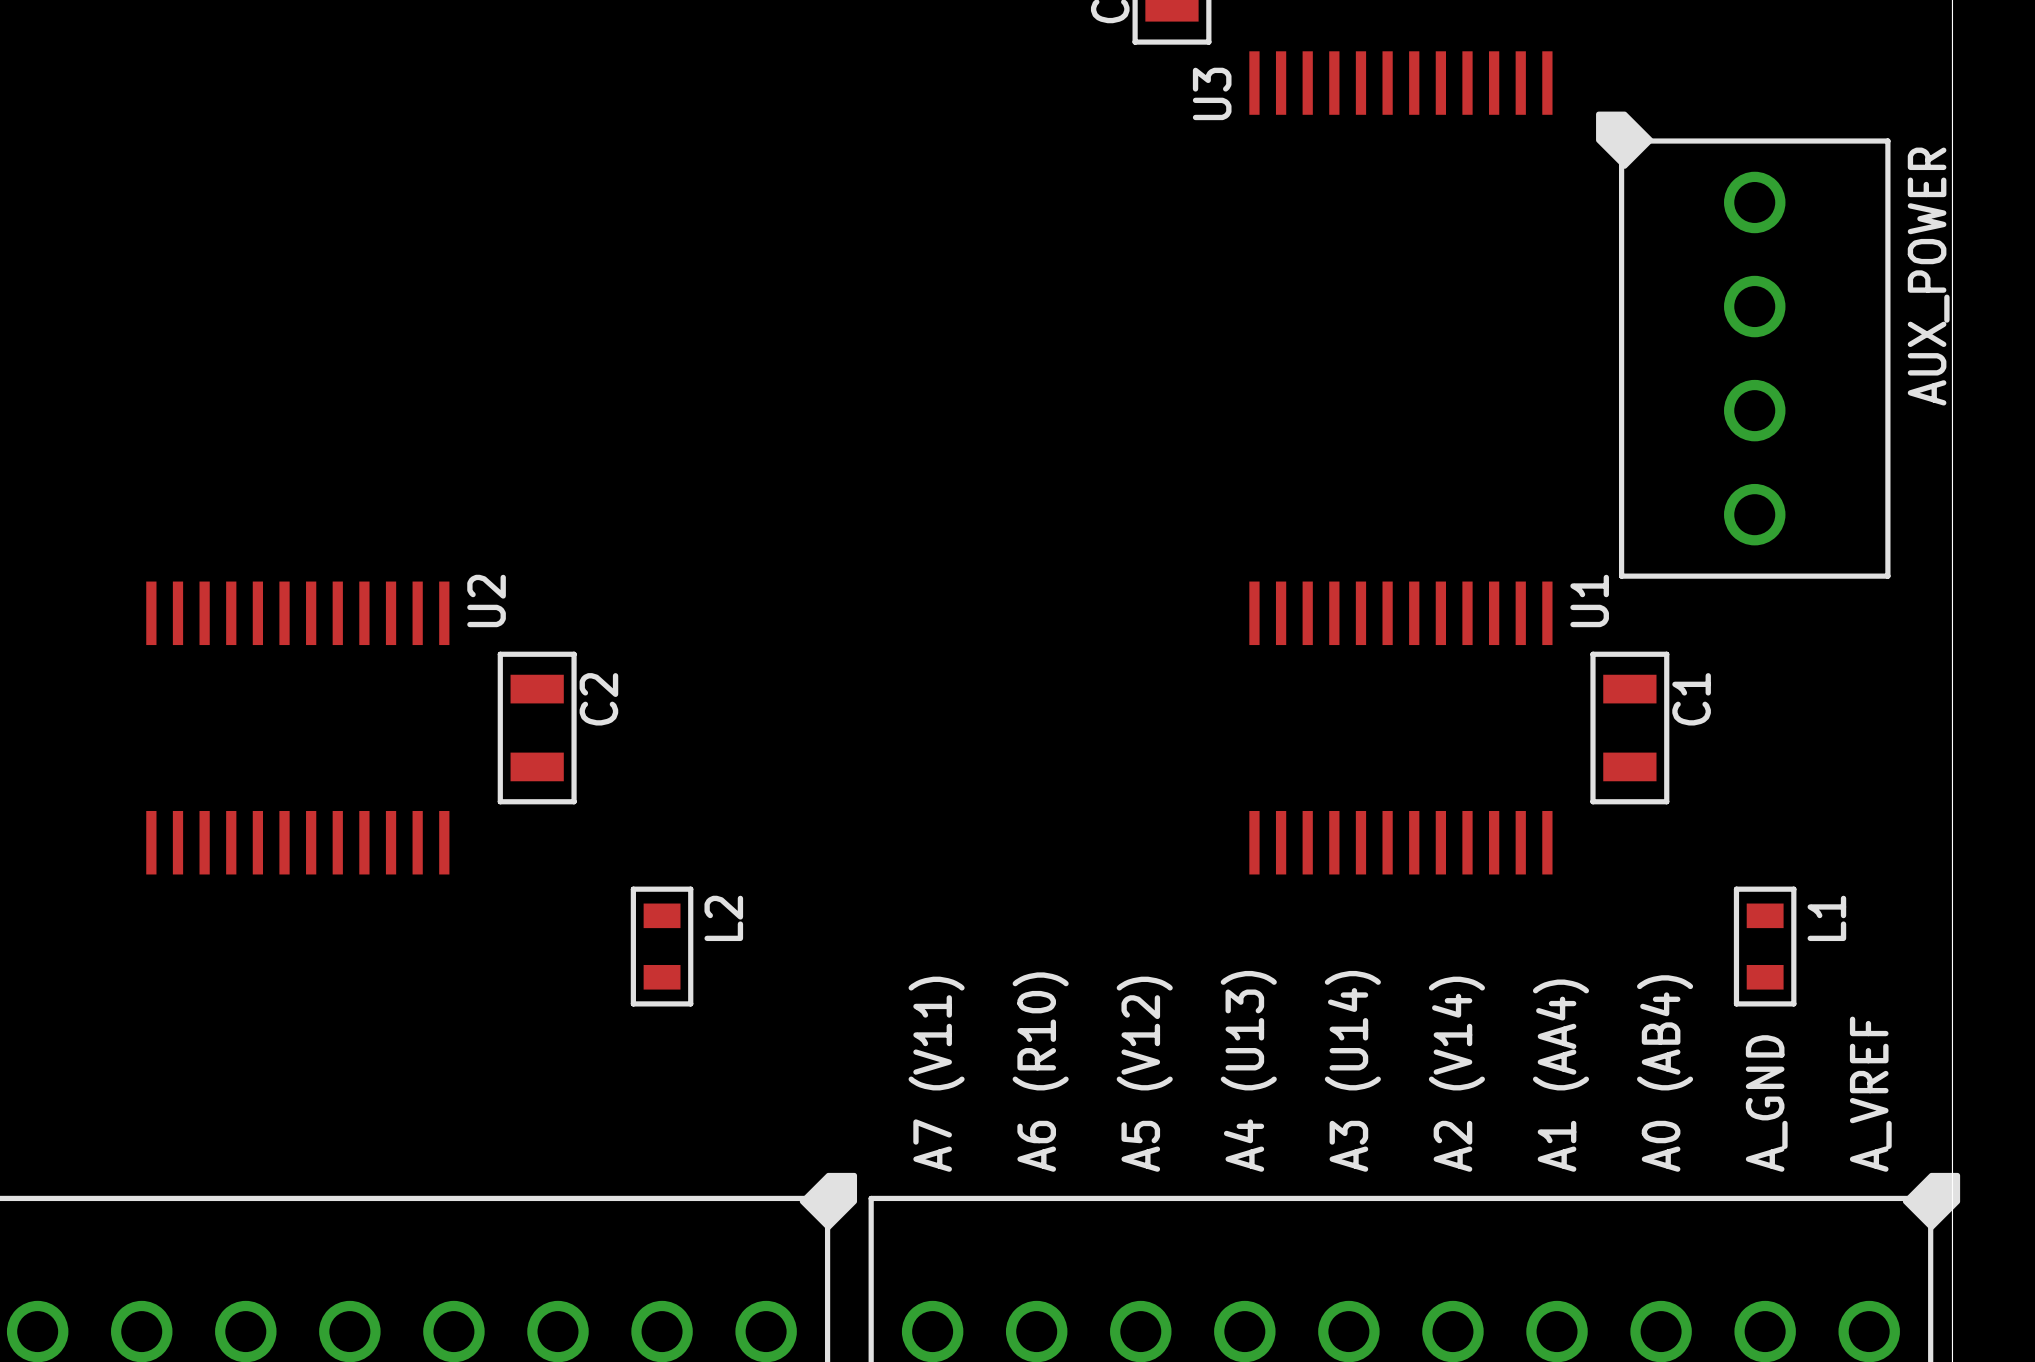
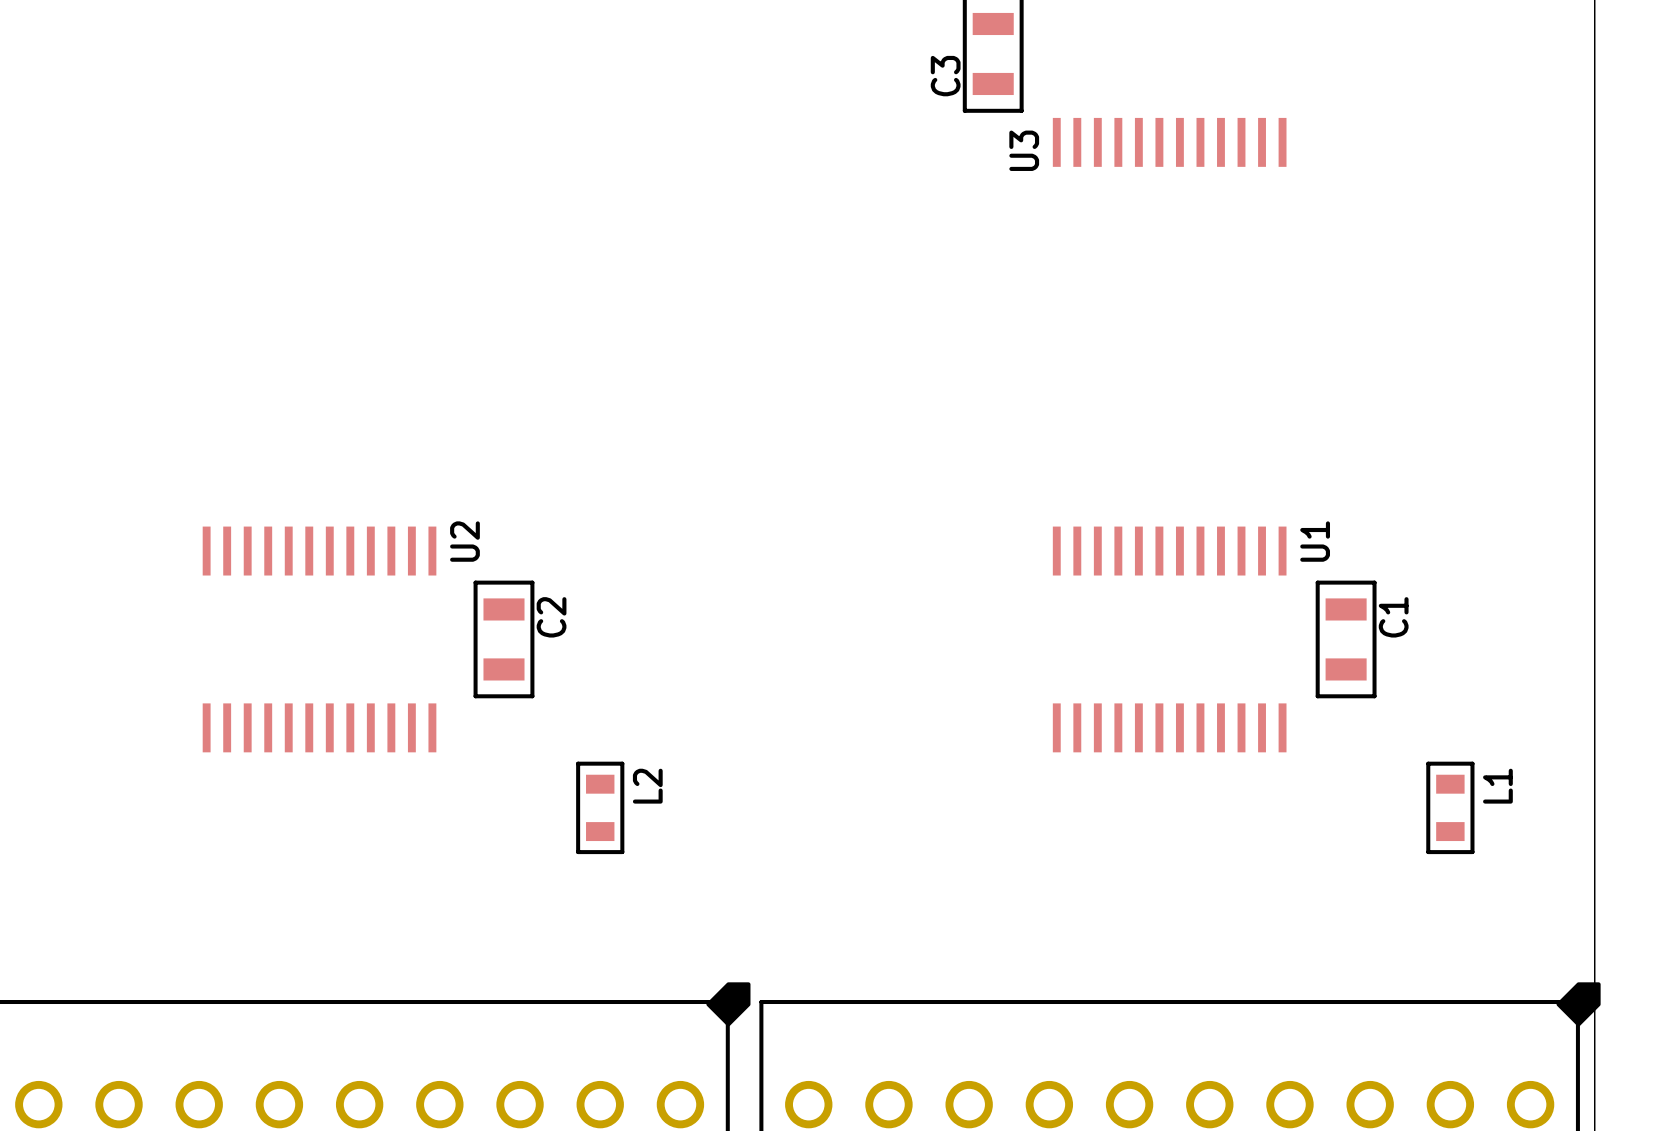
AUX_POWER: (1743, 345) -> none
part text: A4 (U13) (1248, 1071) -> none
part text: A3 (U14) (1352, 1071) -> none
part text: A6 (R10) (1040, 1072) -> none
part text: A0 (AB4) (1665, 1073) -> none
part text: A7 (V11) (936, 1074) -> none
part text: A5 (V12) (1144, 1074) -> none
part text: A2 (V14) (1456, 1074) -> none
part text: A1 (AA4) (1560, 1075) -> none
part text: A_VREF (1870, 1094) -> none
part text: A_GND (1766, 1103) -> none

